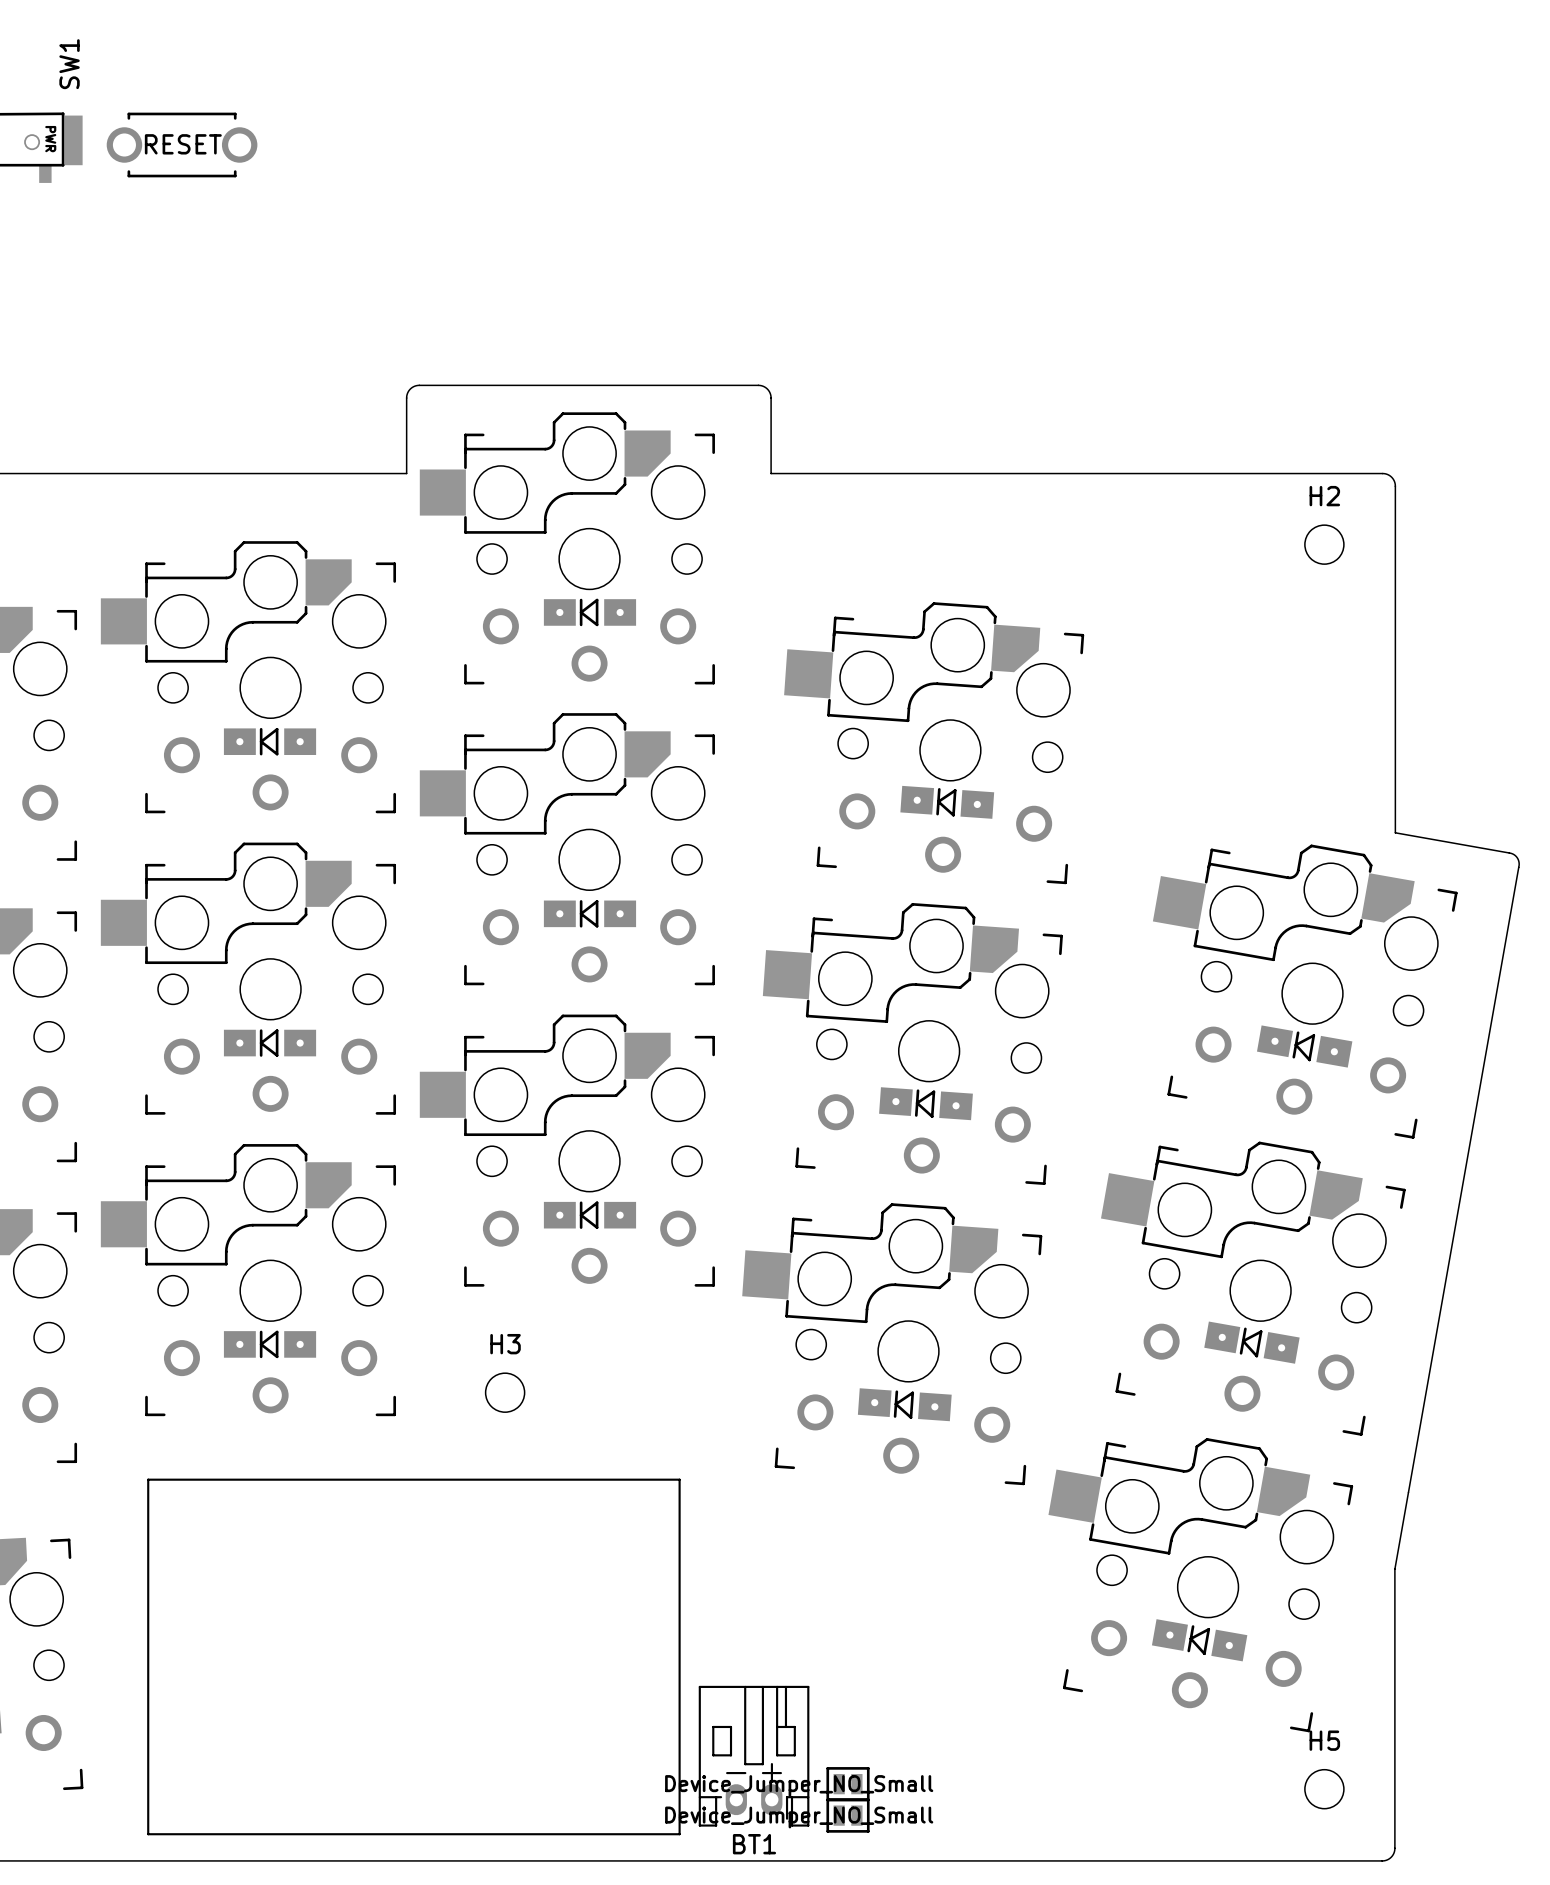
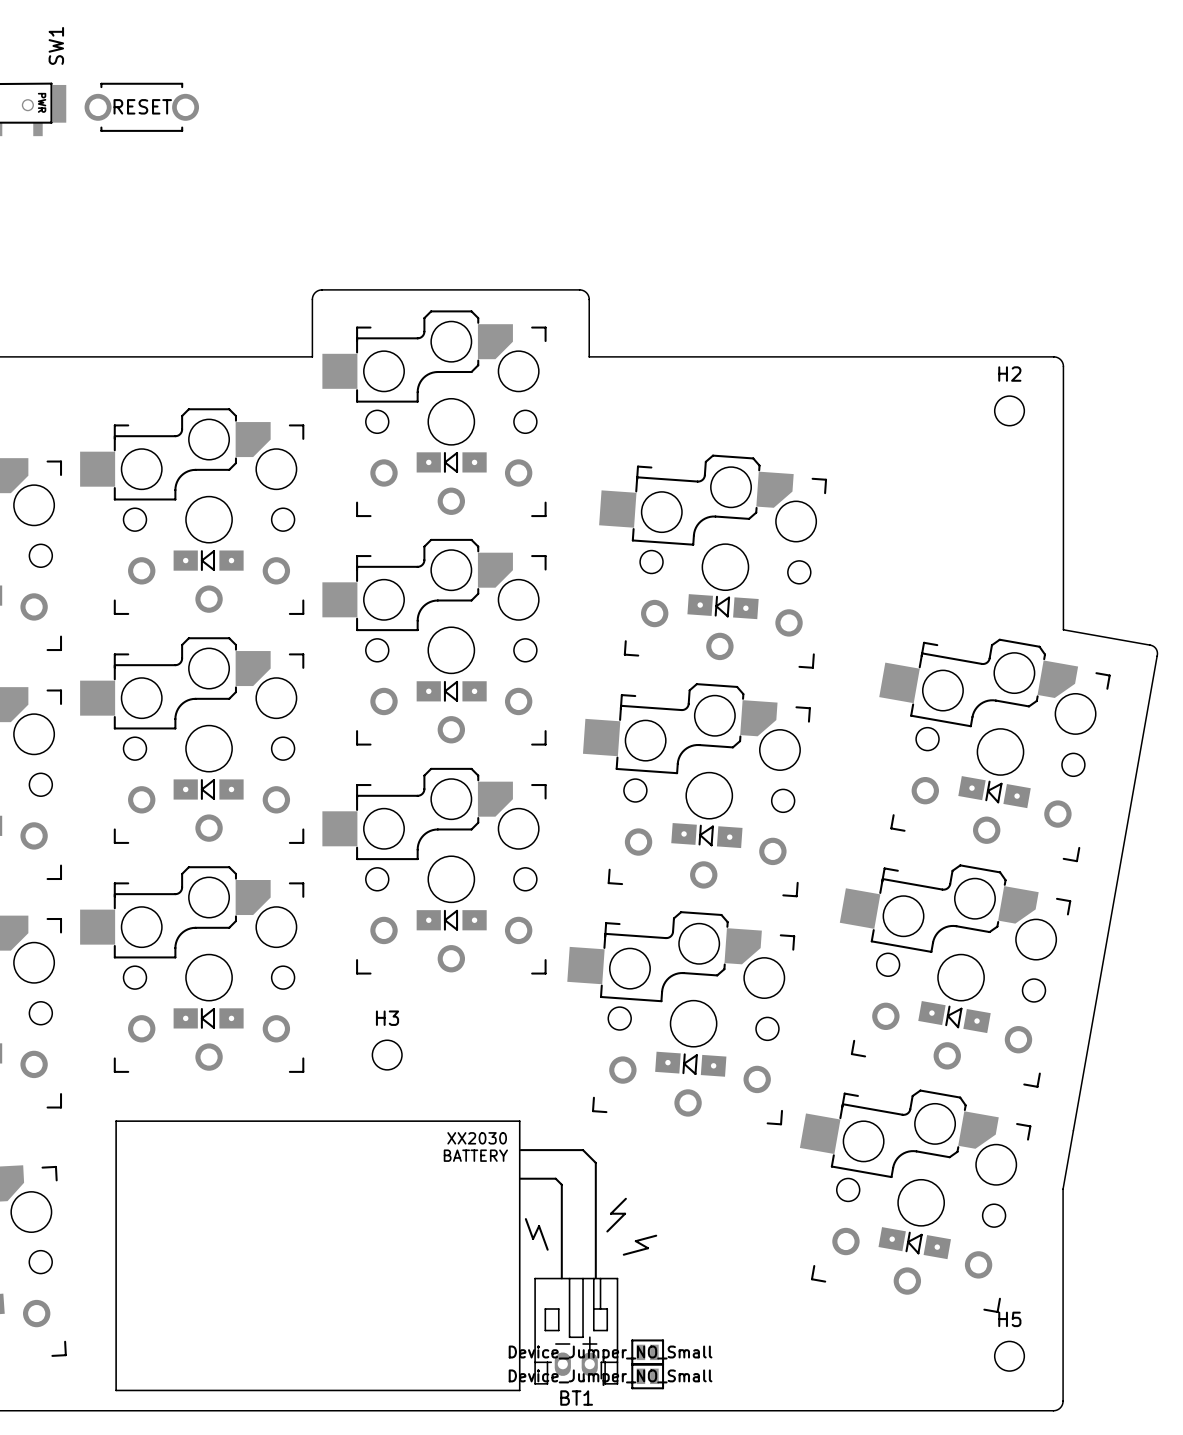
text: none -> XX2030 (477, 1138)
line: none -> (520, 1150) (583, 1150) (595, 1162) (595, 1278)
text: none -> BATTERY (475, 1155)
line: none -> (520, 1178) (555, 1178) (561, 1184) (561, 1278)
line: none -> (625, 1198) (610, 1213) (625, 1213) (607, 1231)
line: none -> (525, 1219) (533, 1238) (539, 1226) (547, 1249)
line: none -> (656, 1235) (635, 1241) (648, 1248) (623, 1254)

